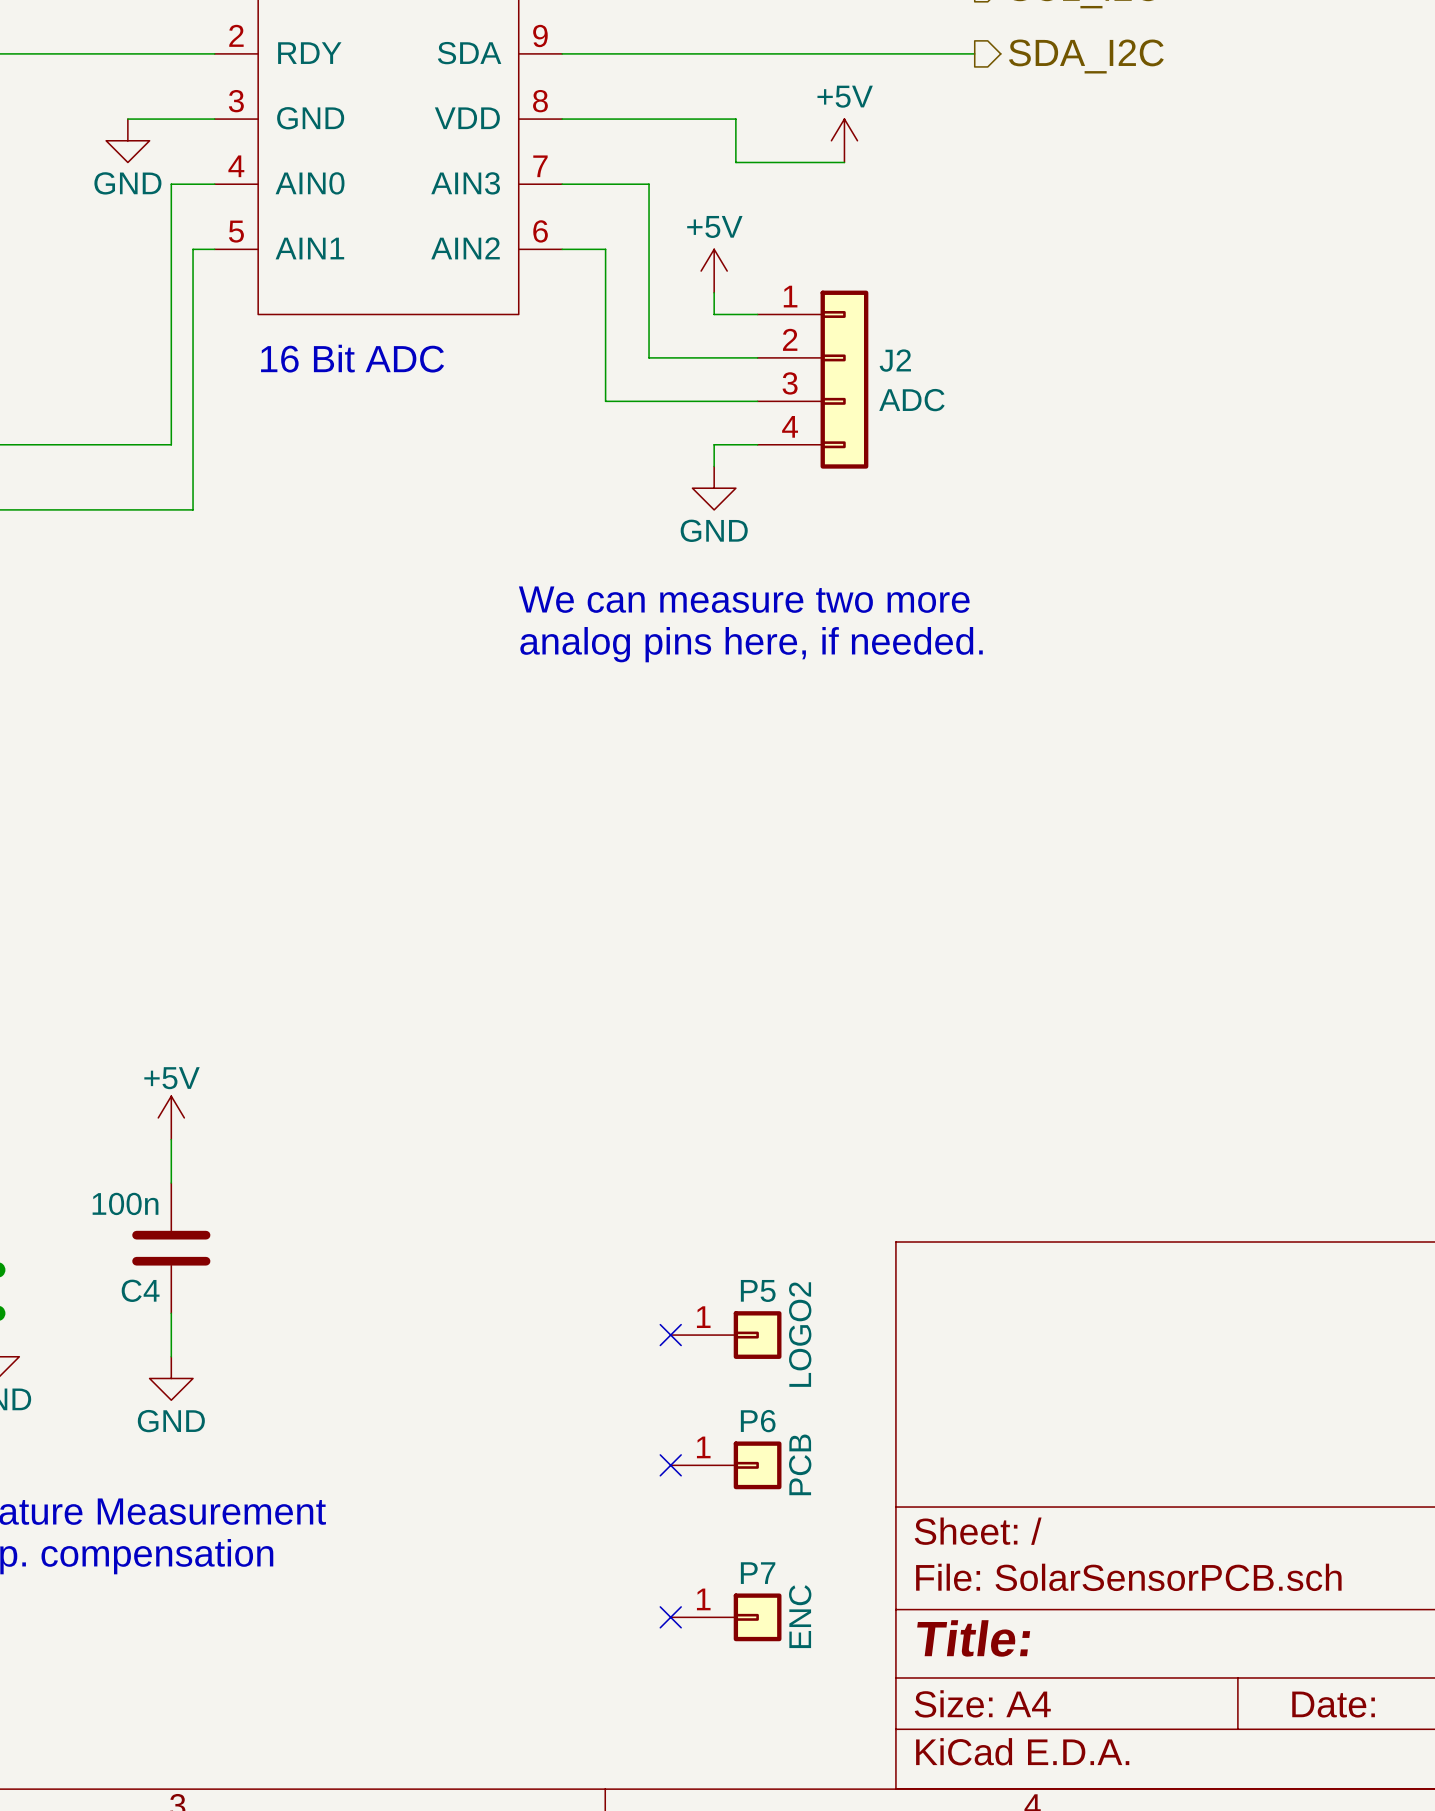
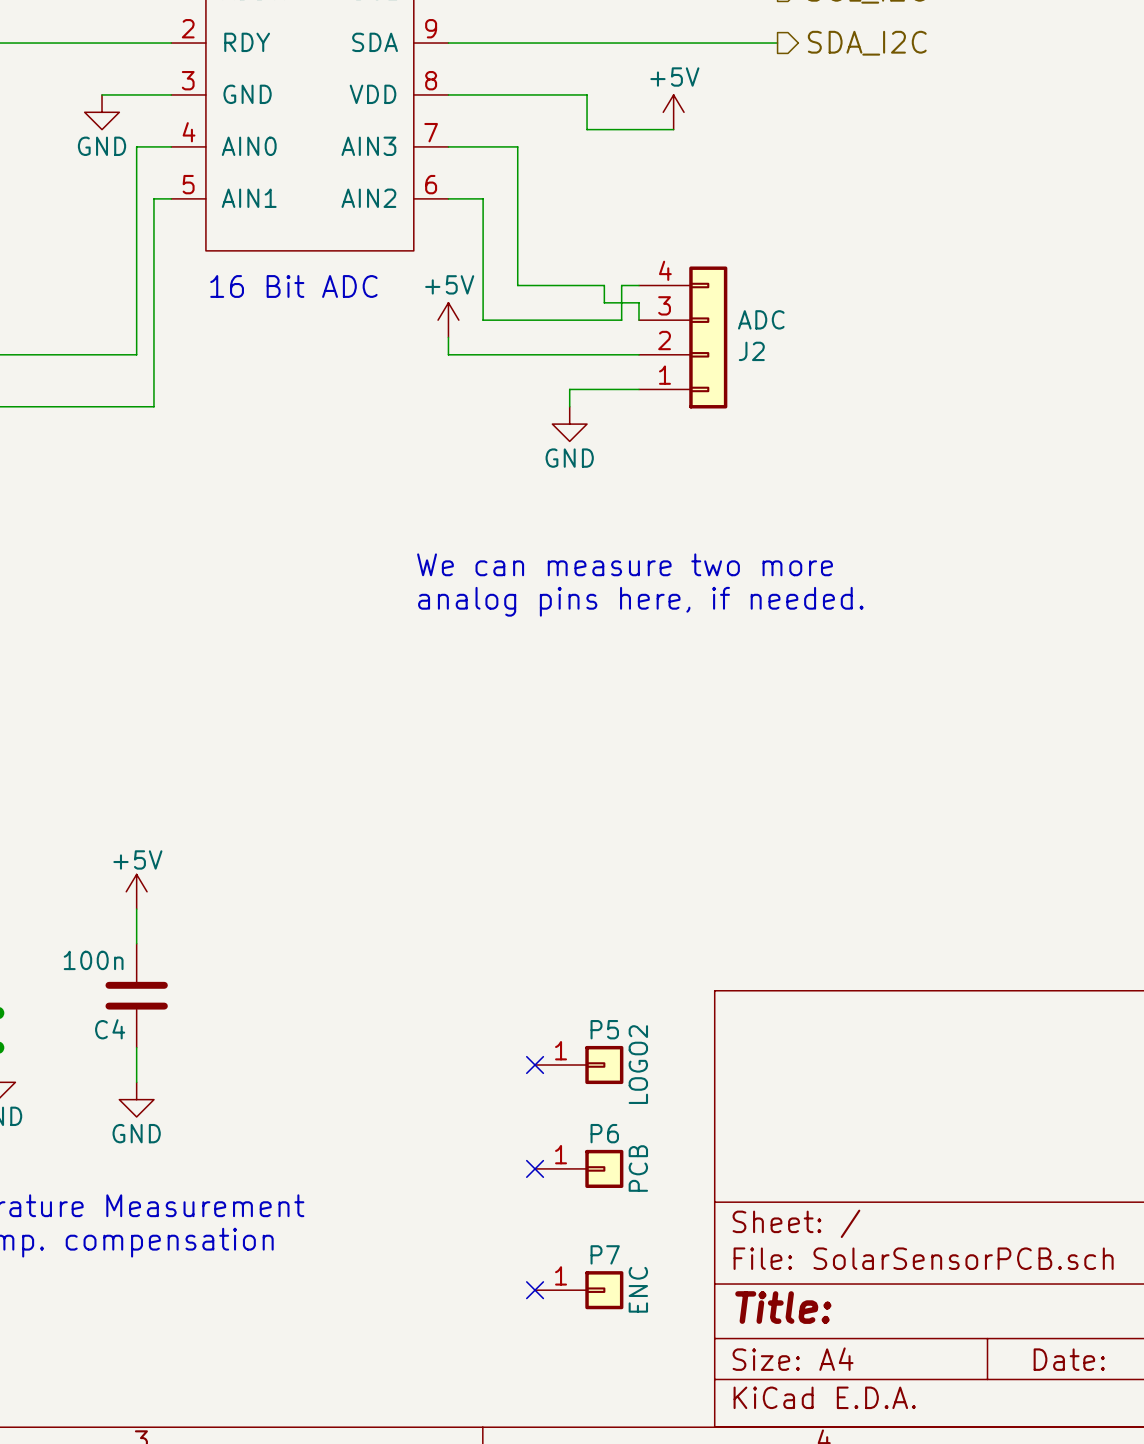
power symbol position: +5V (714, 271) -> +5V (448, 320)
wire: (714, 292) (714, 314) (757, 314) -> none
wire: none -> (604, 285) (604, 302) (638, 302) (638, 320)
wire: none -> (638, 285) (621, 285) (621, 320) (604, 320)
J2 flip: as is (844, 379) -> up-down (708, 337)
wire: (714, 444) (714, 466) -> (569, 354) (448, 354) (448, 337)
power symbol position: GND (714, 488) -> GND (569, 424)
wire: none -> (638, 389) (569, 389) (569, 406)
text position: We can measure two more (744, 599) -> We can measure two more (625, 564)
text position: analog pins here, if needed. (751, 644) -> analog pins here, if needed. (640, 601)

